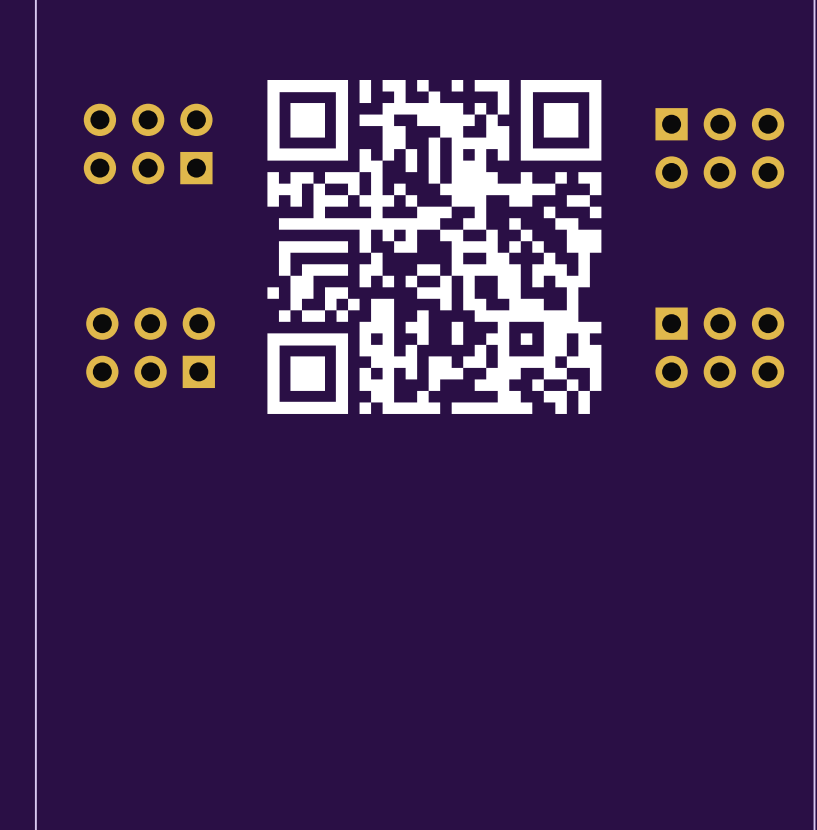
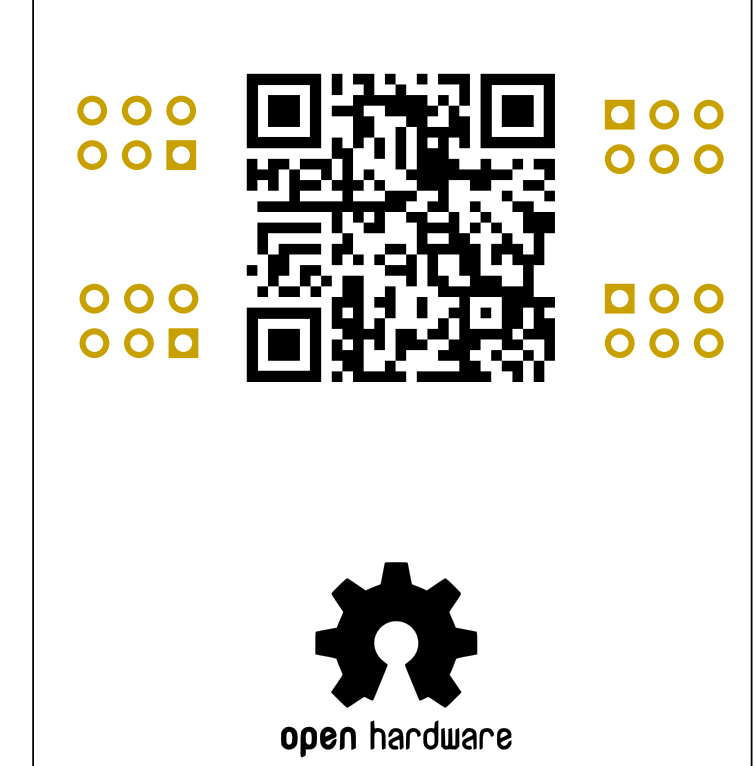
drawing: none -> [281, 562, 512, 758]

